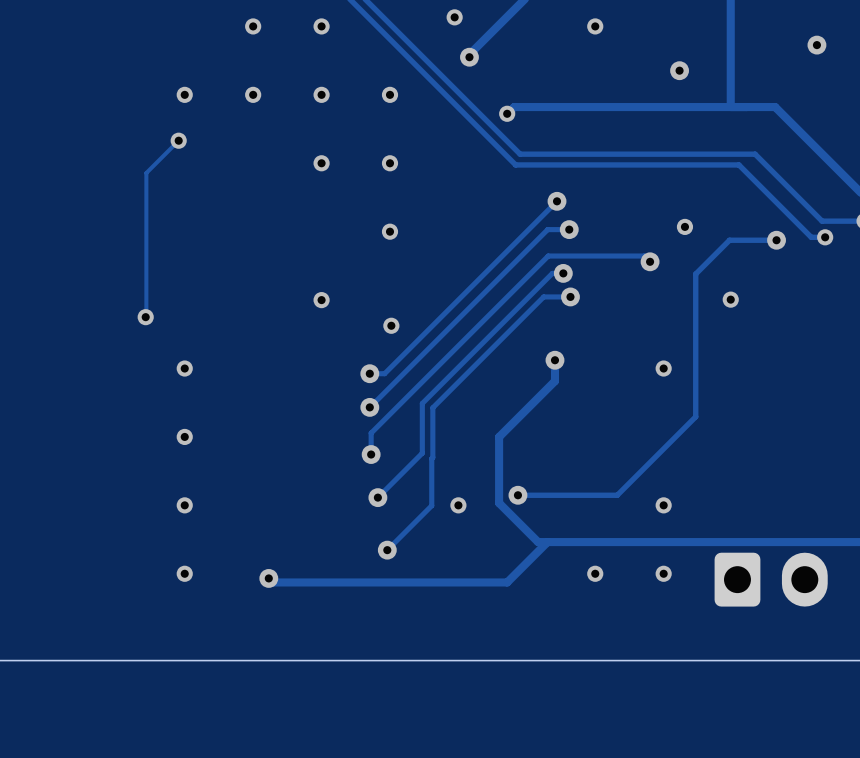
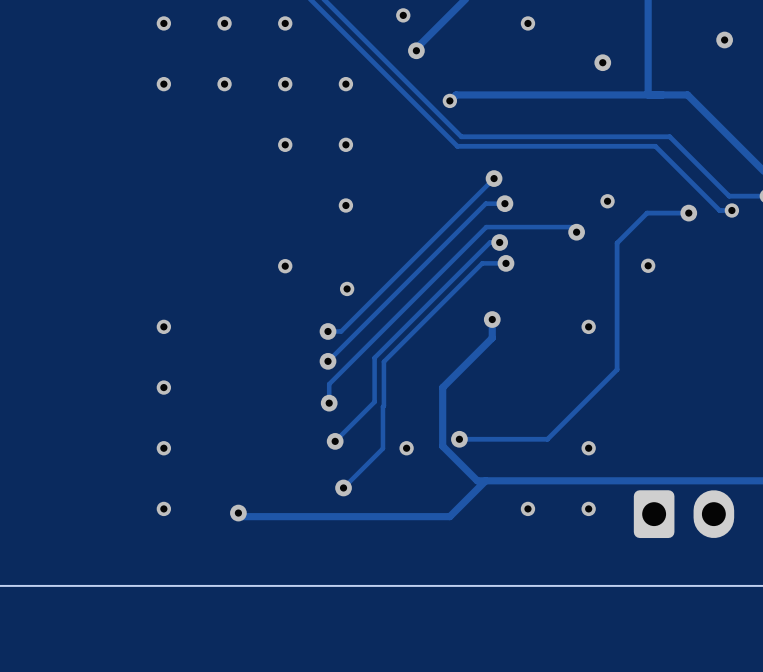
track: (178, 140) (146, 173) (145, 317) -> none
via position: (178, 140) -> (163, 23)
via: (145, 317) -> none

